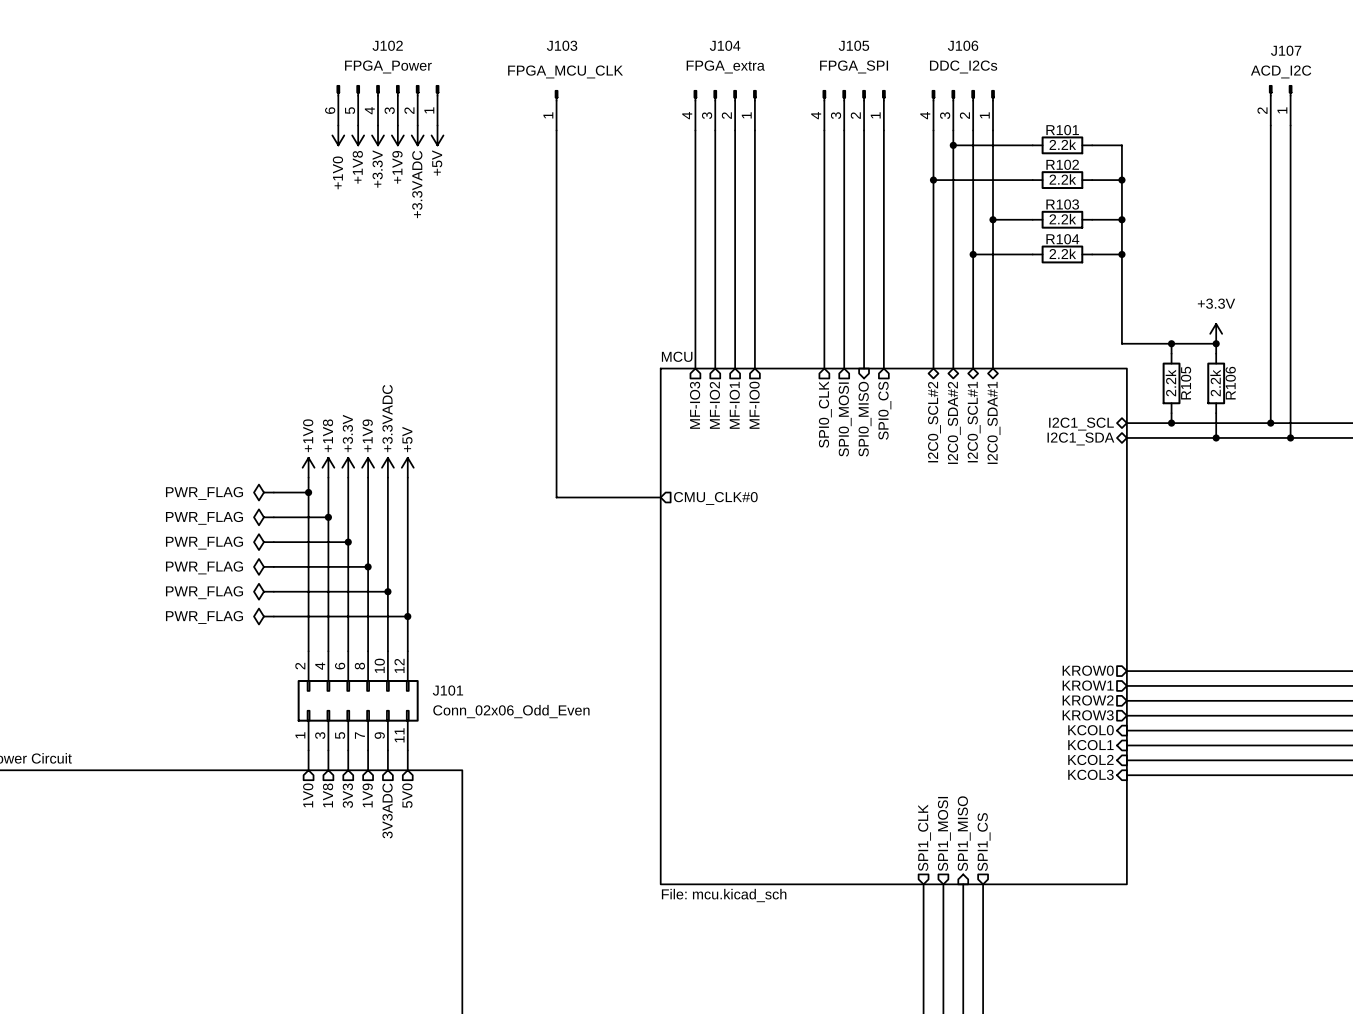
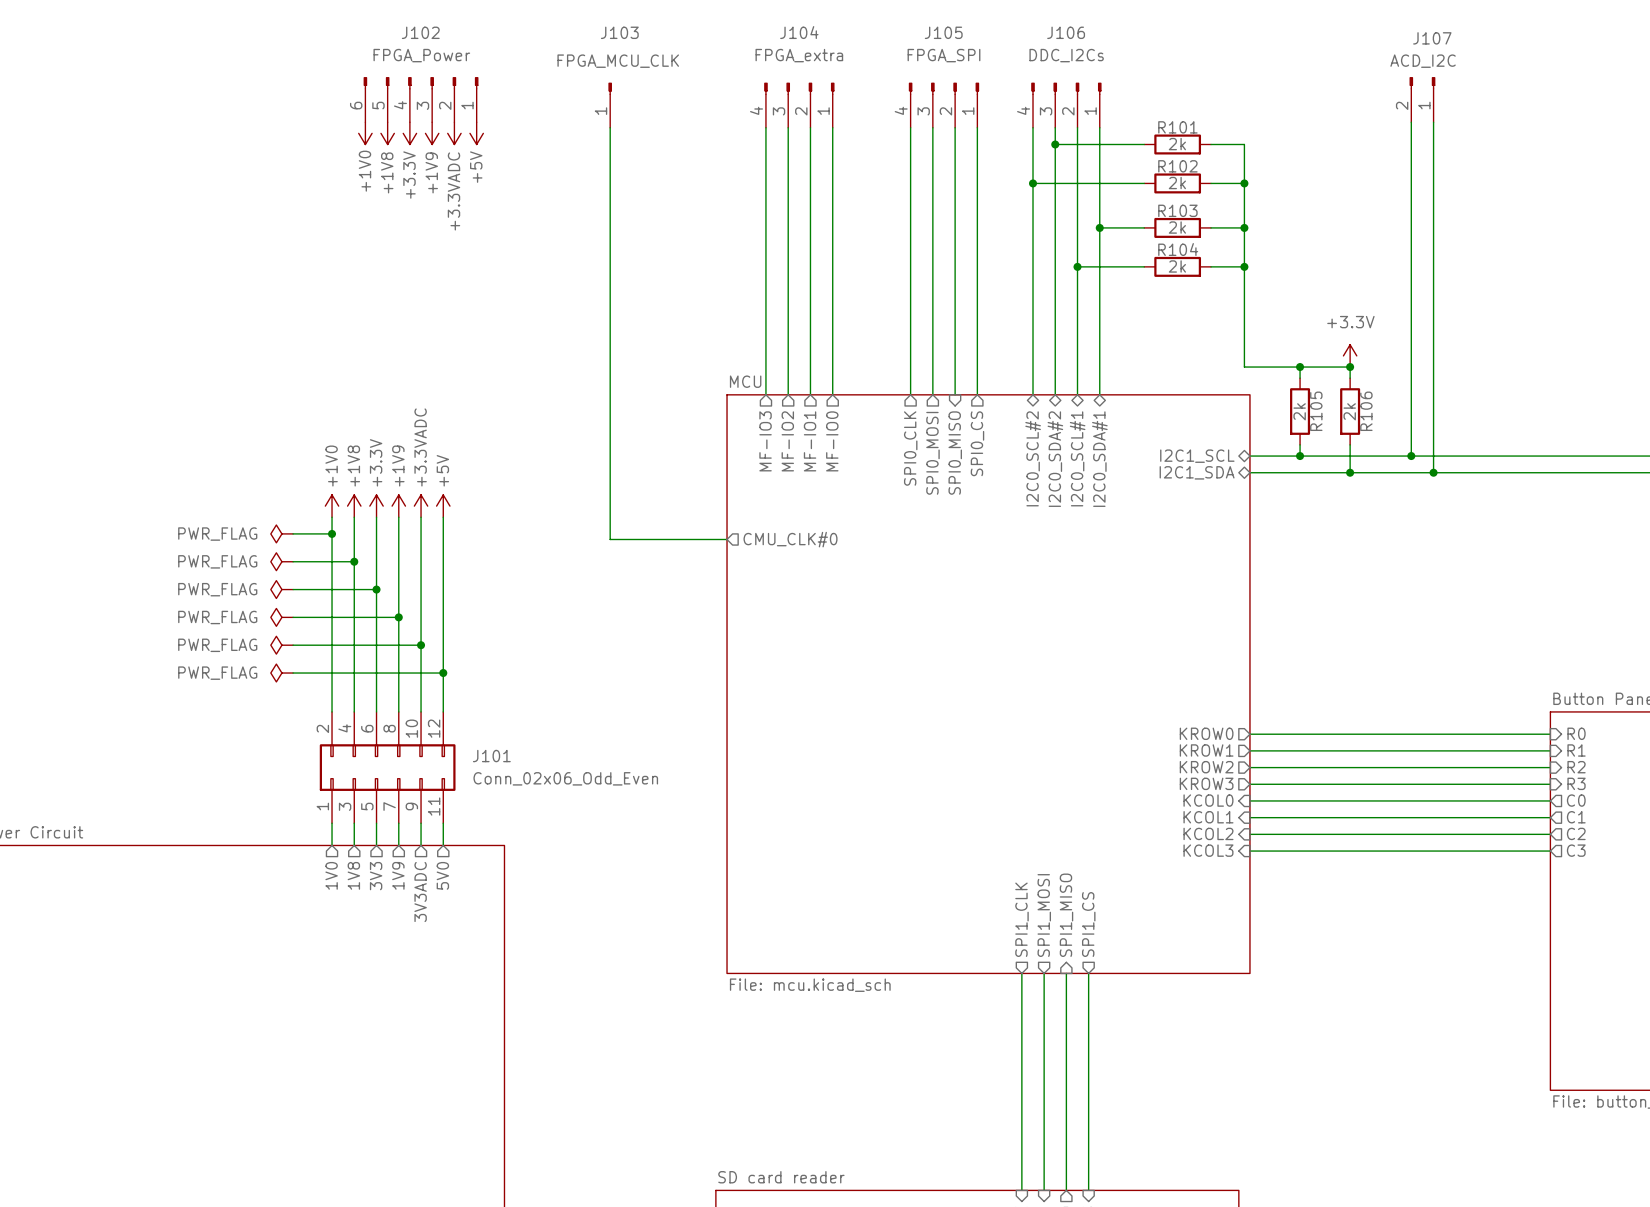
R101 value: 2.2k (1062, 144) -> 2k (1177, 144)
R102 value: 2.2k (1062, 179) -> 2k (1177, 183)
R103 value: 2.2k (1062, 219) -> 2k (1177, 227)
R104 value: 2.2k (1062, 253) -> 2k (1177, 266)
R105 value: 2.2k (1170, 383) -> 2k (1299, 411)
R106 value: 2.2k (1215, 383) -> 2k (1349, 411)

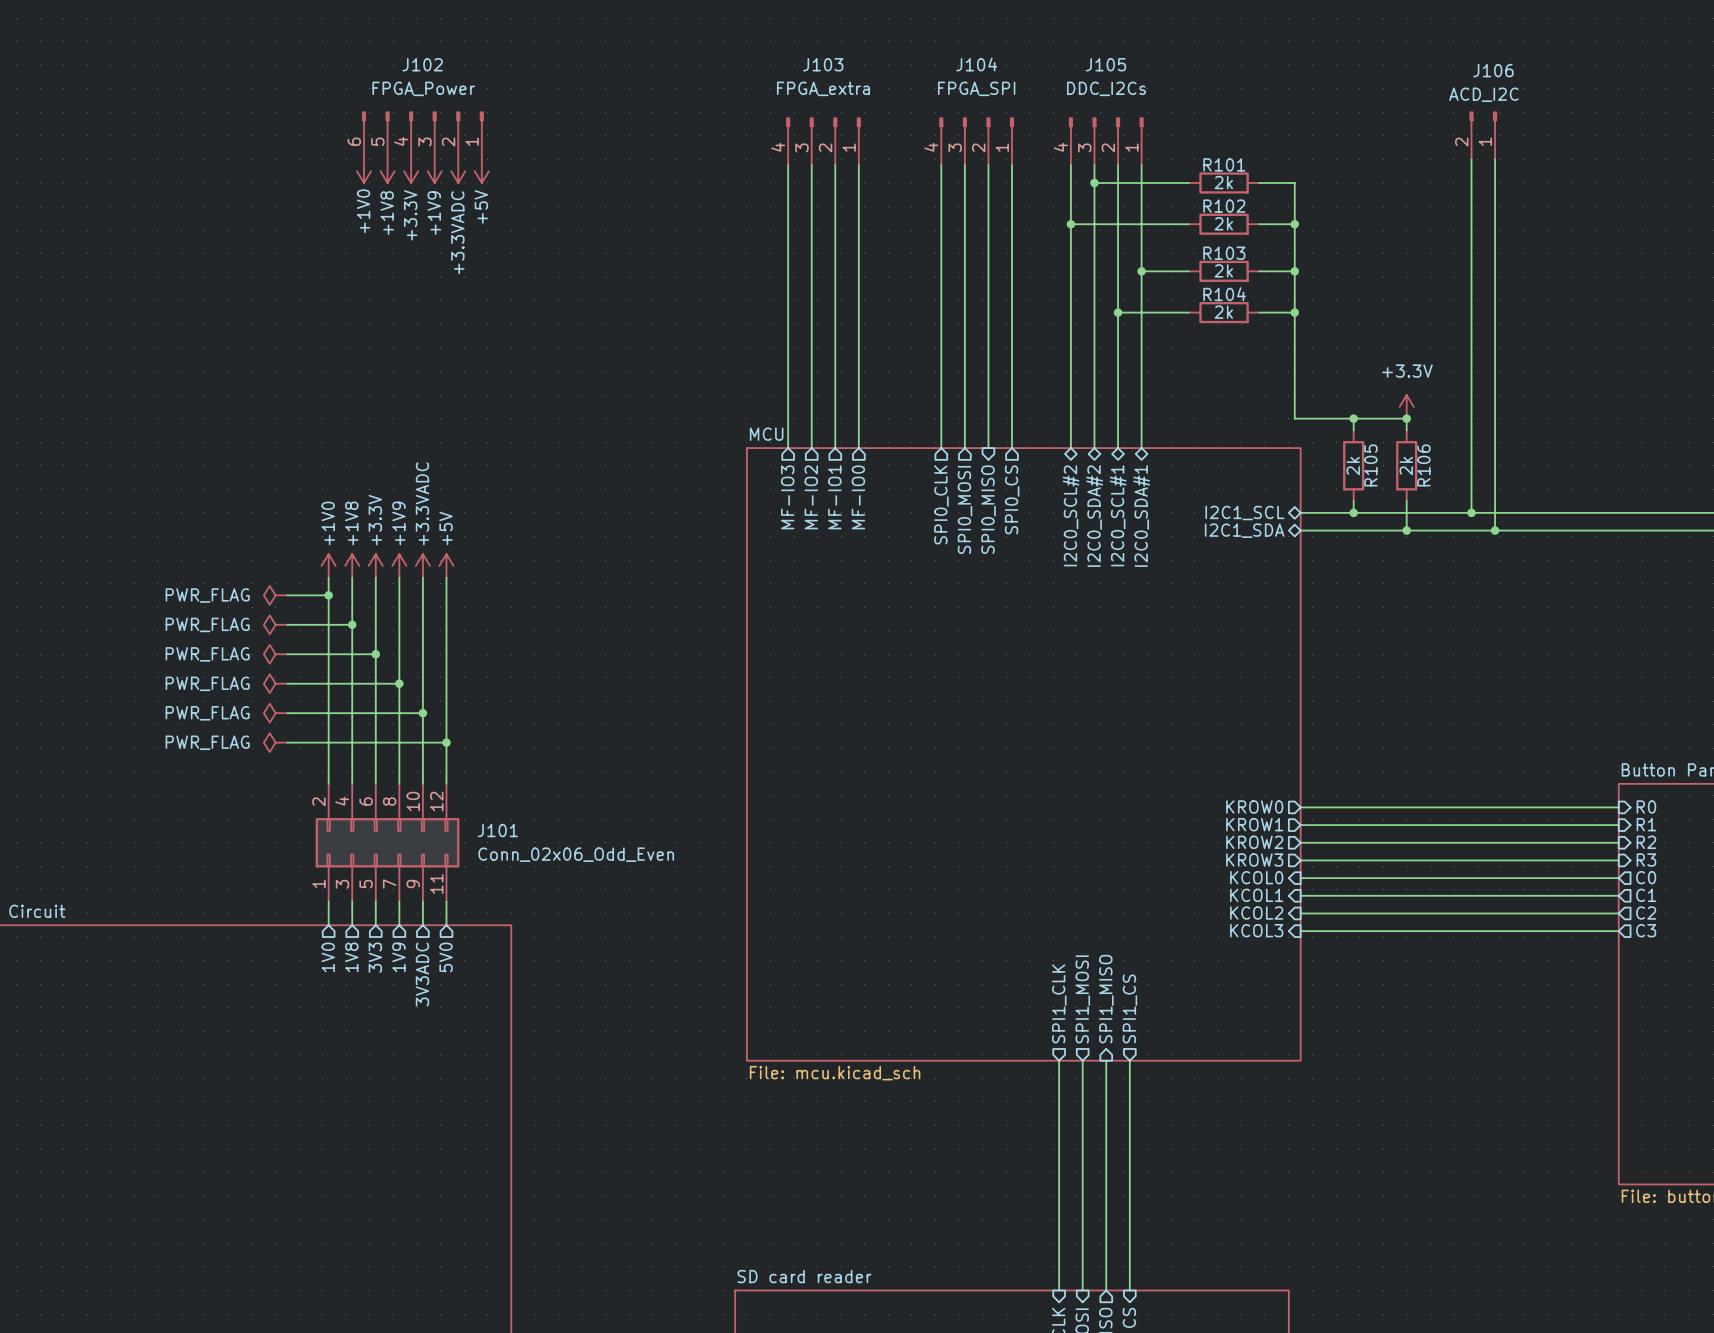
J104 name: J104 (799, 32) -> J103 (823, 64)
J105 name: J105 (943, 32) -> J104 (976, 64)
J106 name: J106 (1066, 32) -> J105 (1105, 64)
J107 name: J107 (1432, 38) -> J106 (1493, 70)
J103: FPGA_MCU_CLK (610, 105) -> none
wire: (610, 127) (610, 539) (727, 539) -> none
sheet pin: CMU_CLK#0 (790, 539) -> none

